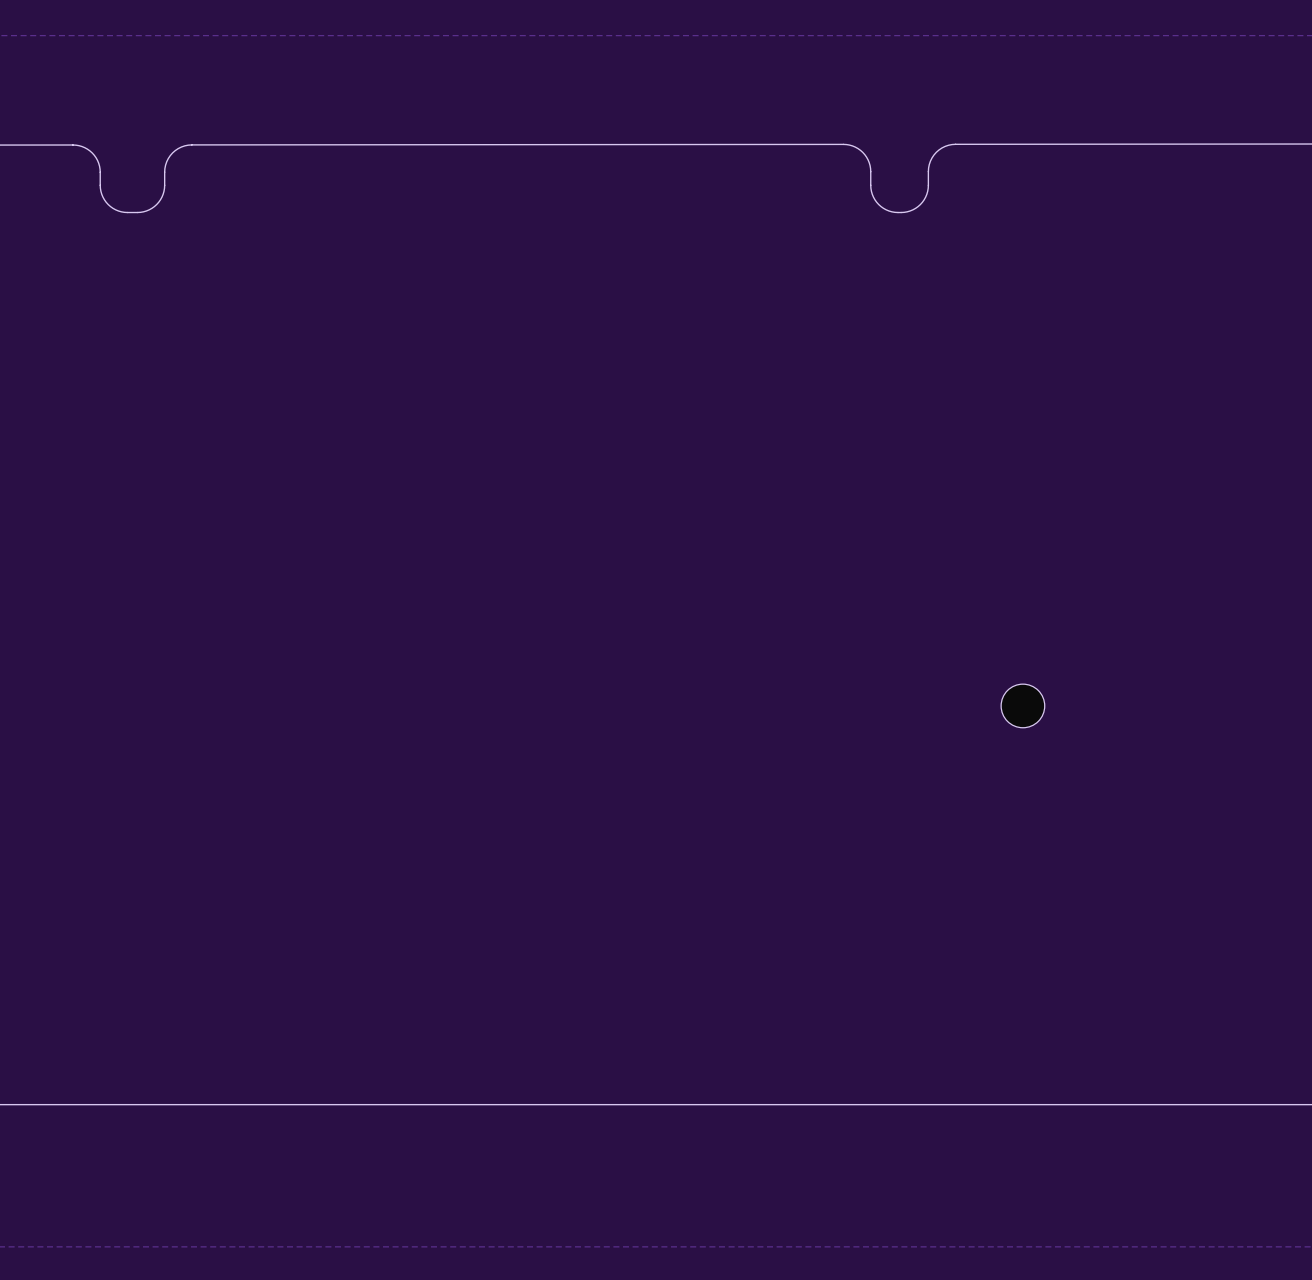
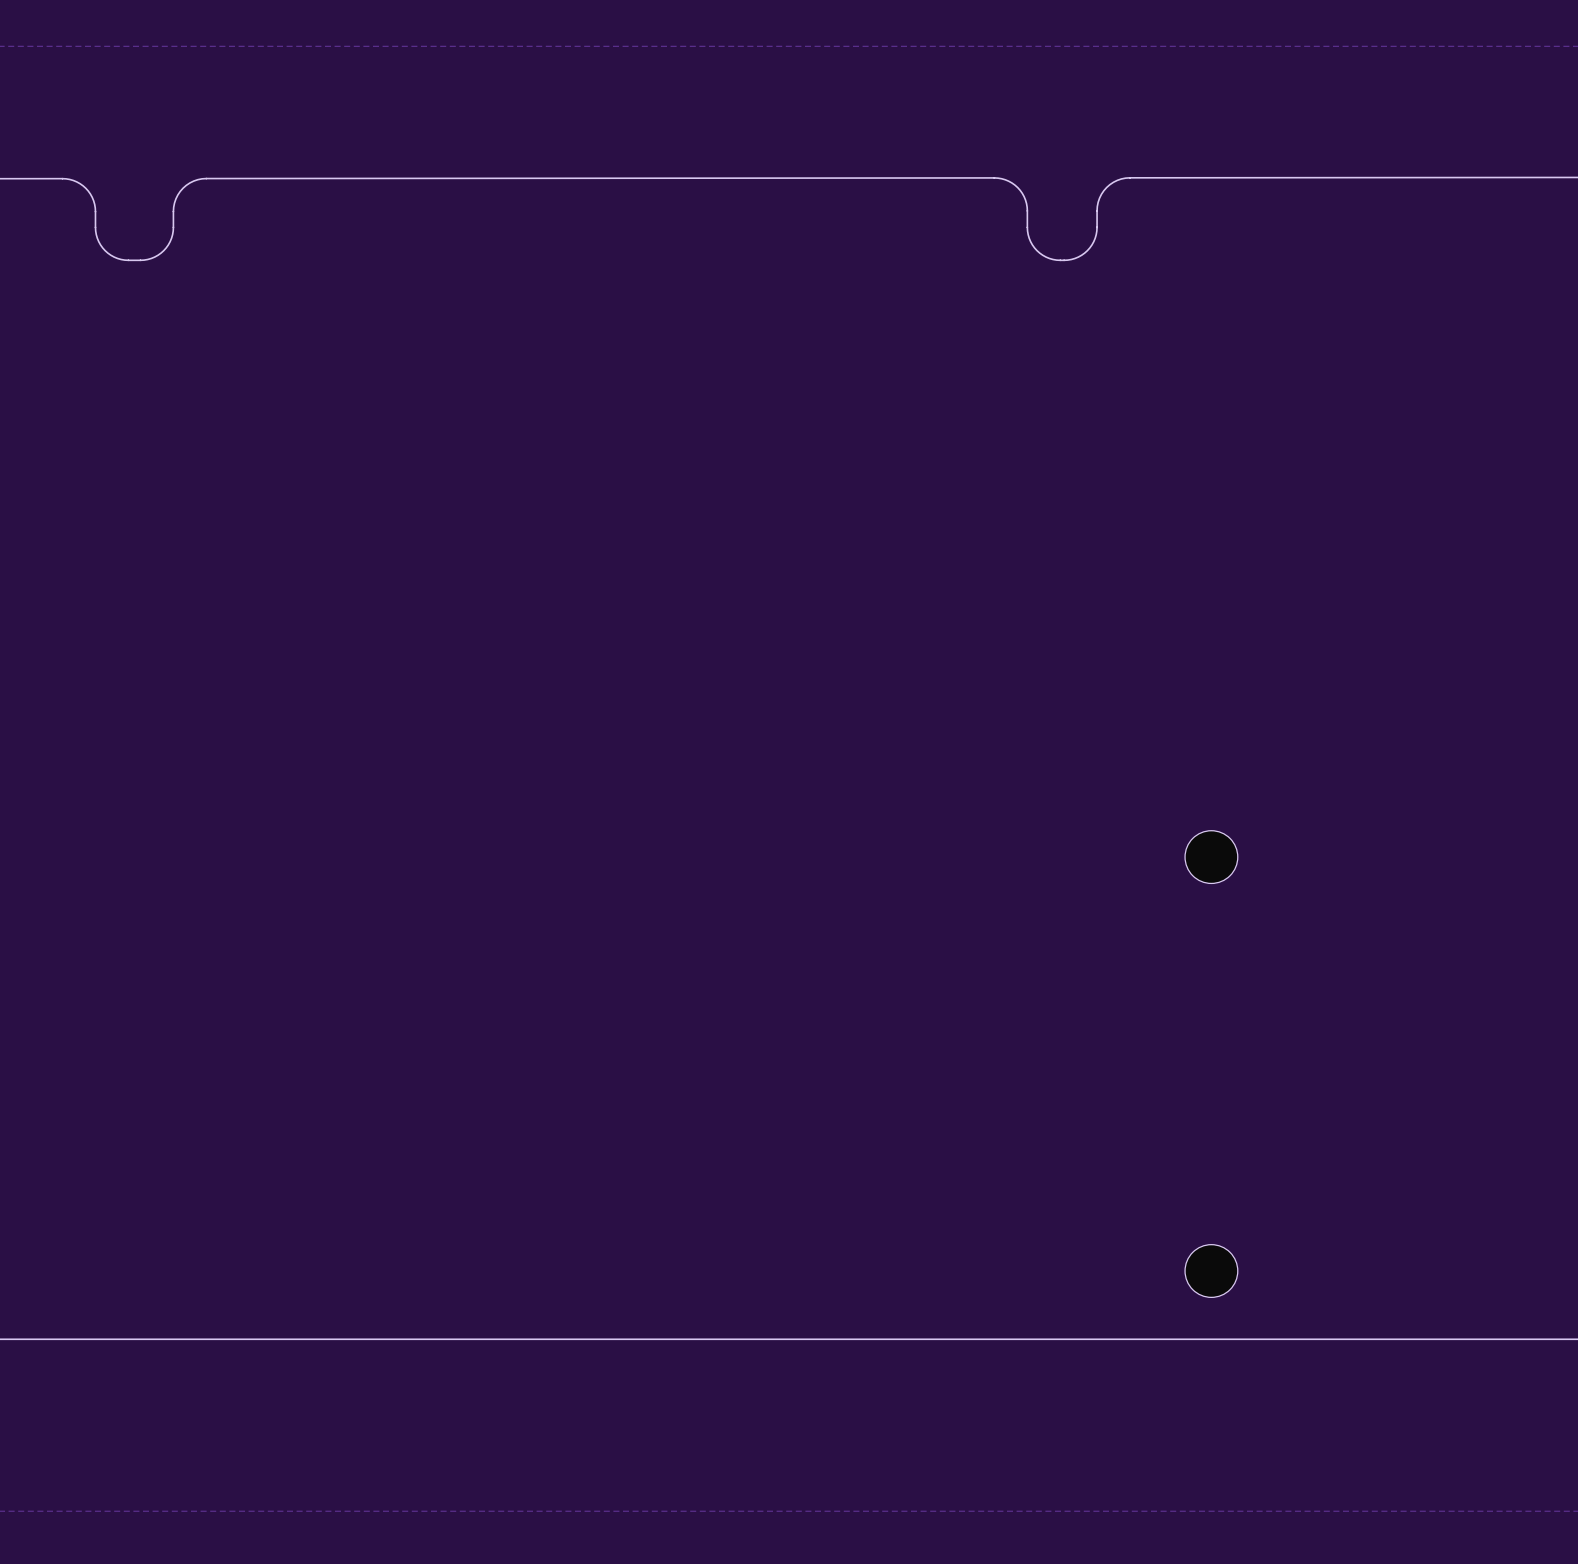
part: none -> (1211, 1271)

